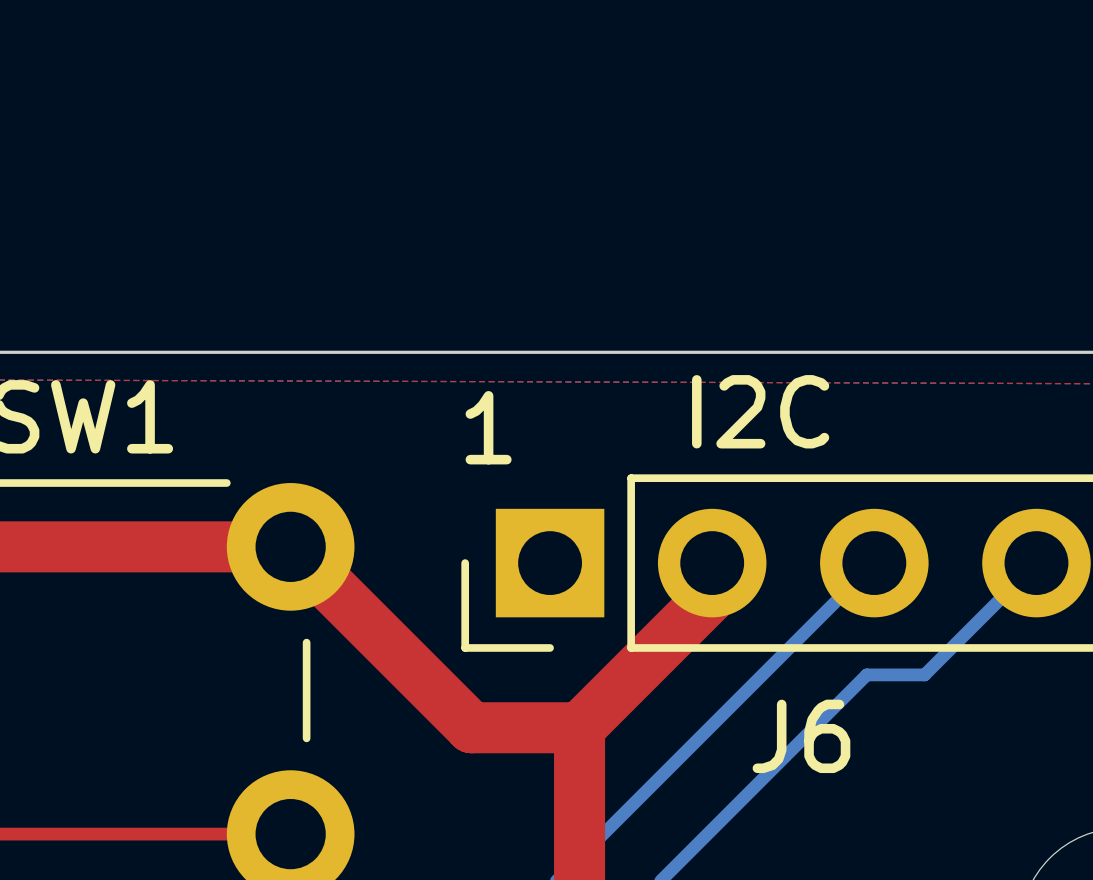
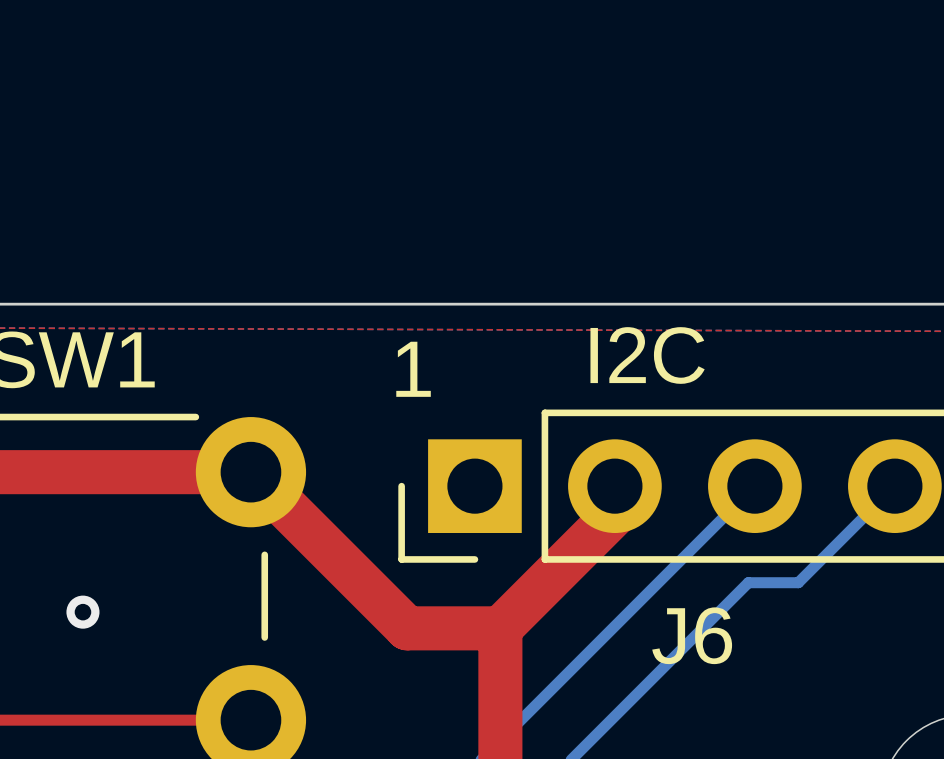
via: none -> (82, 612)

